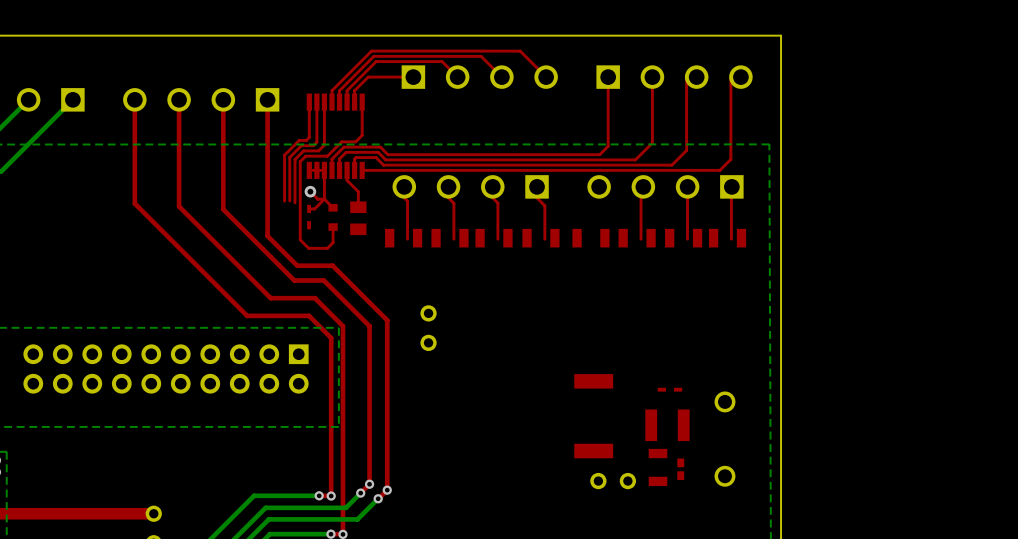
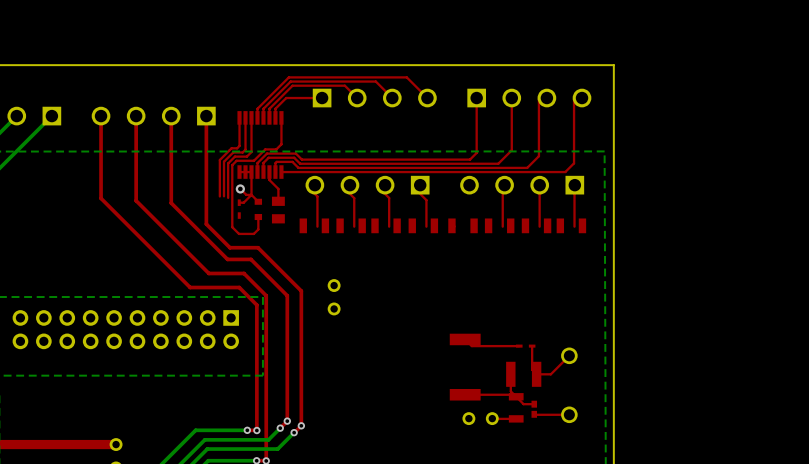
top track: none -> (465, 339) (471, 346) (519, 346)
top track: none -> (532, 346) (532, 369) (536, 374) (550, 374) (569, 355)
top track: none -> (510, 374) (510, 391) (523, 404) (534, 404)
top track: none -> (514, 394) (465, 394)
top track: none -> (534, 414) (569, 414)
top track: none -> (492, 418) (516, 418)

